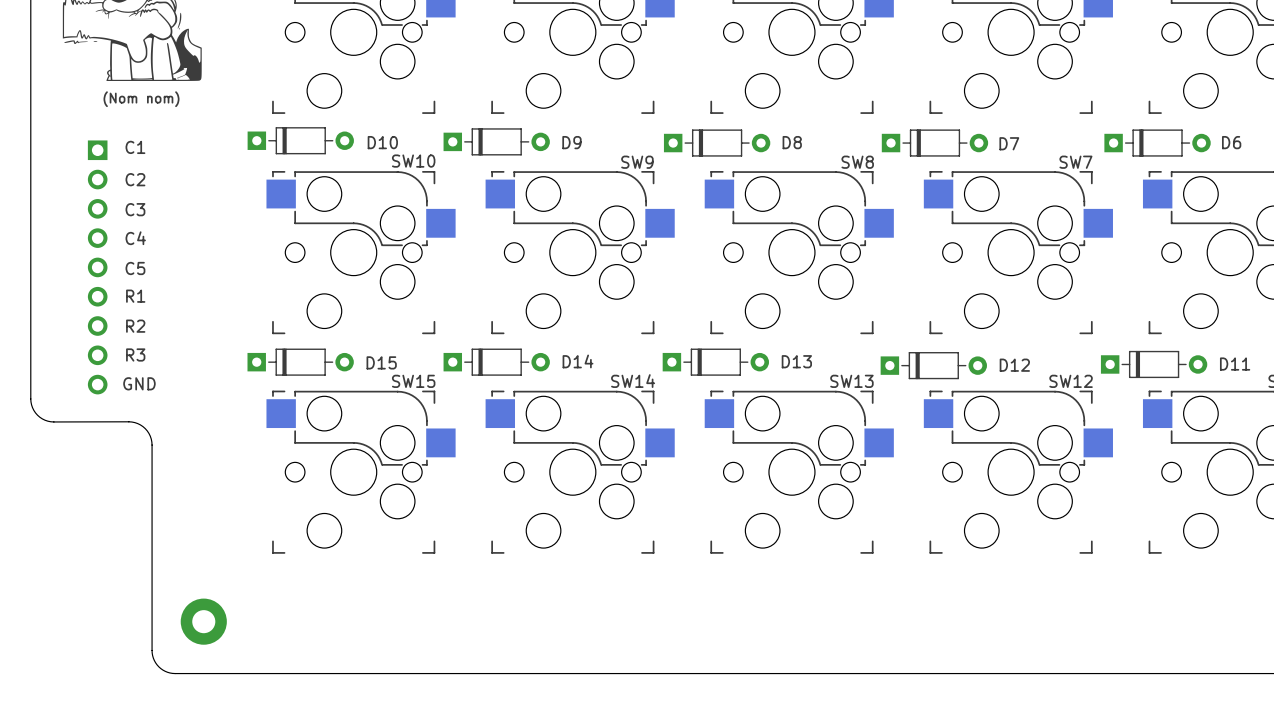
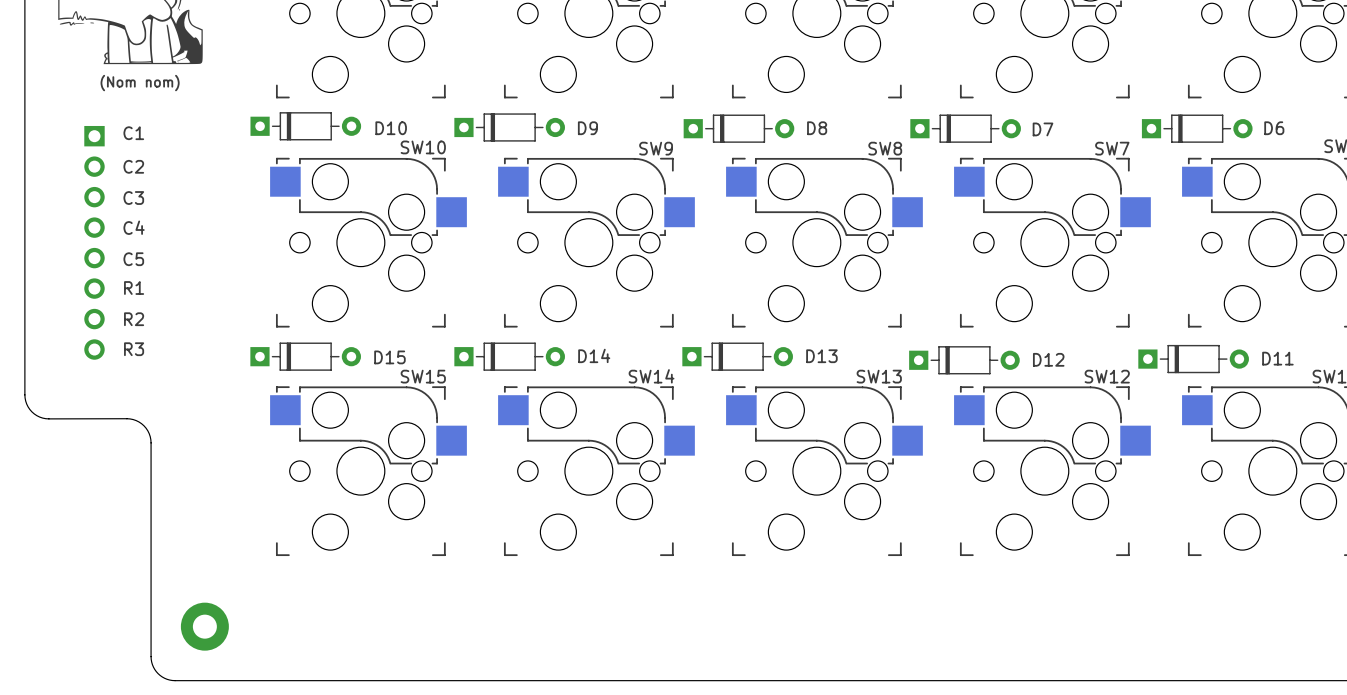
part: (97, 267) -> none
text: GND (139, 383) -> none

